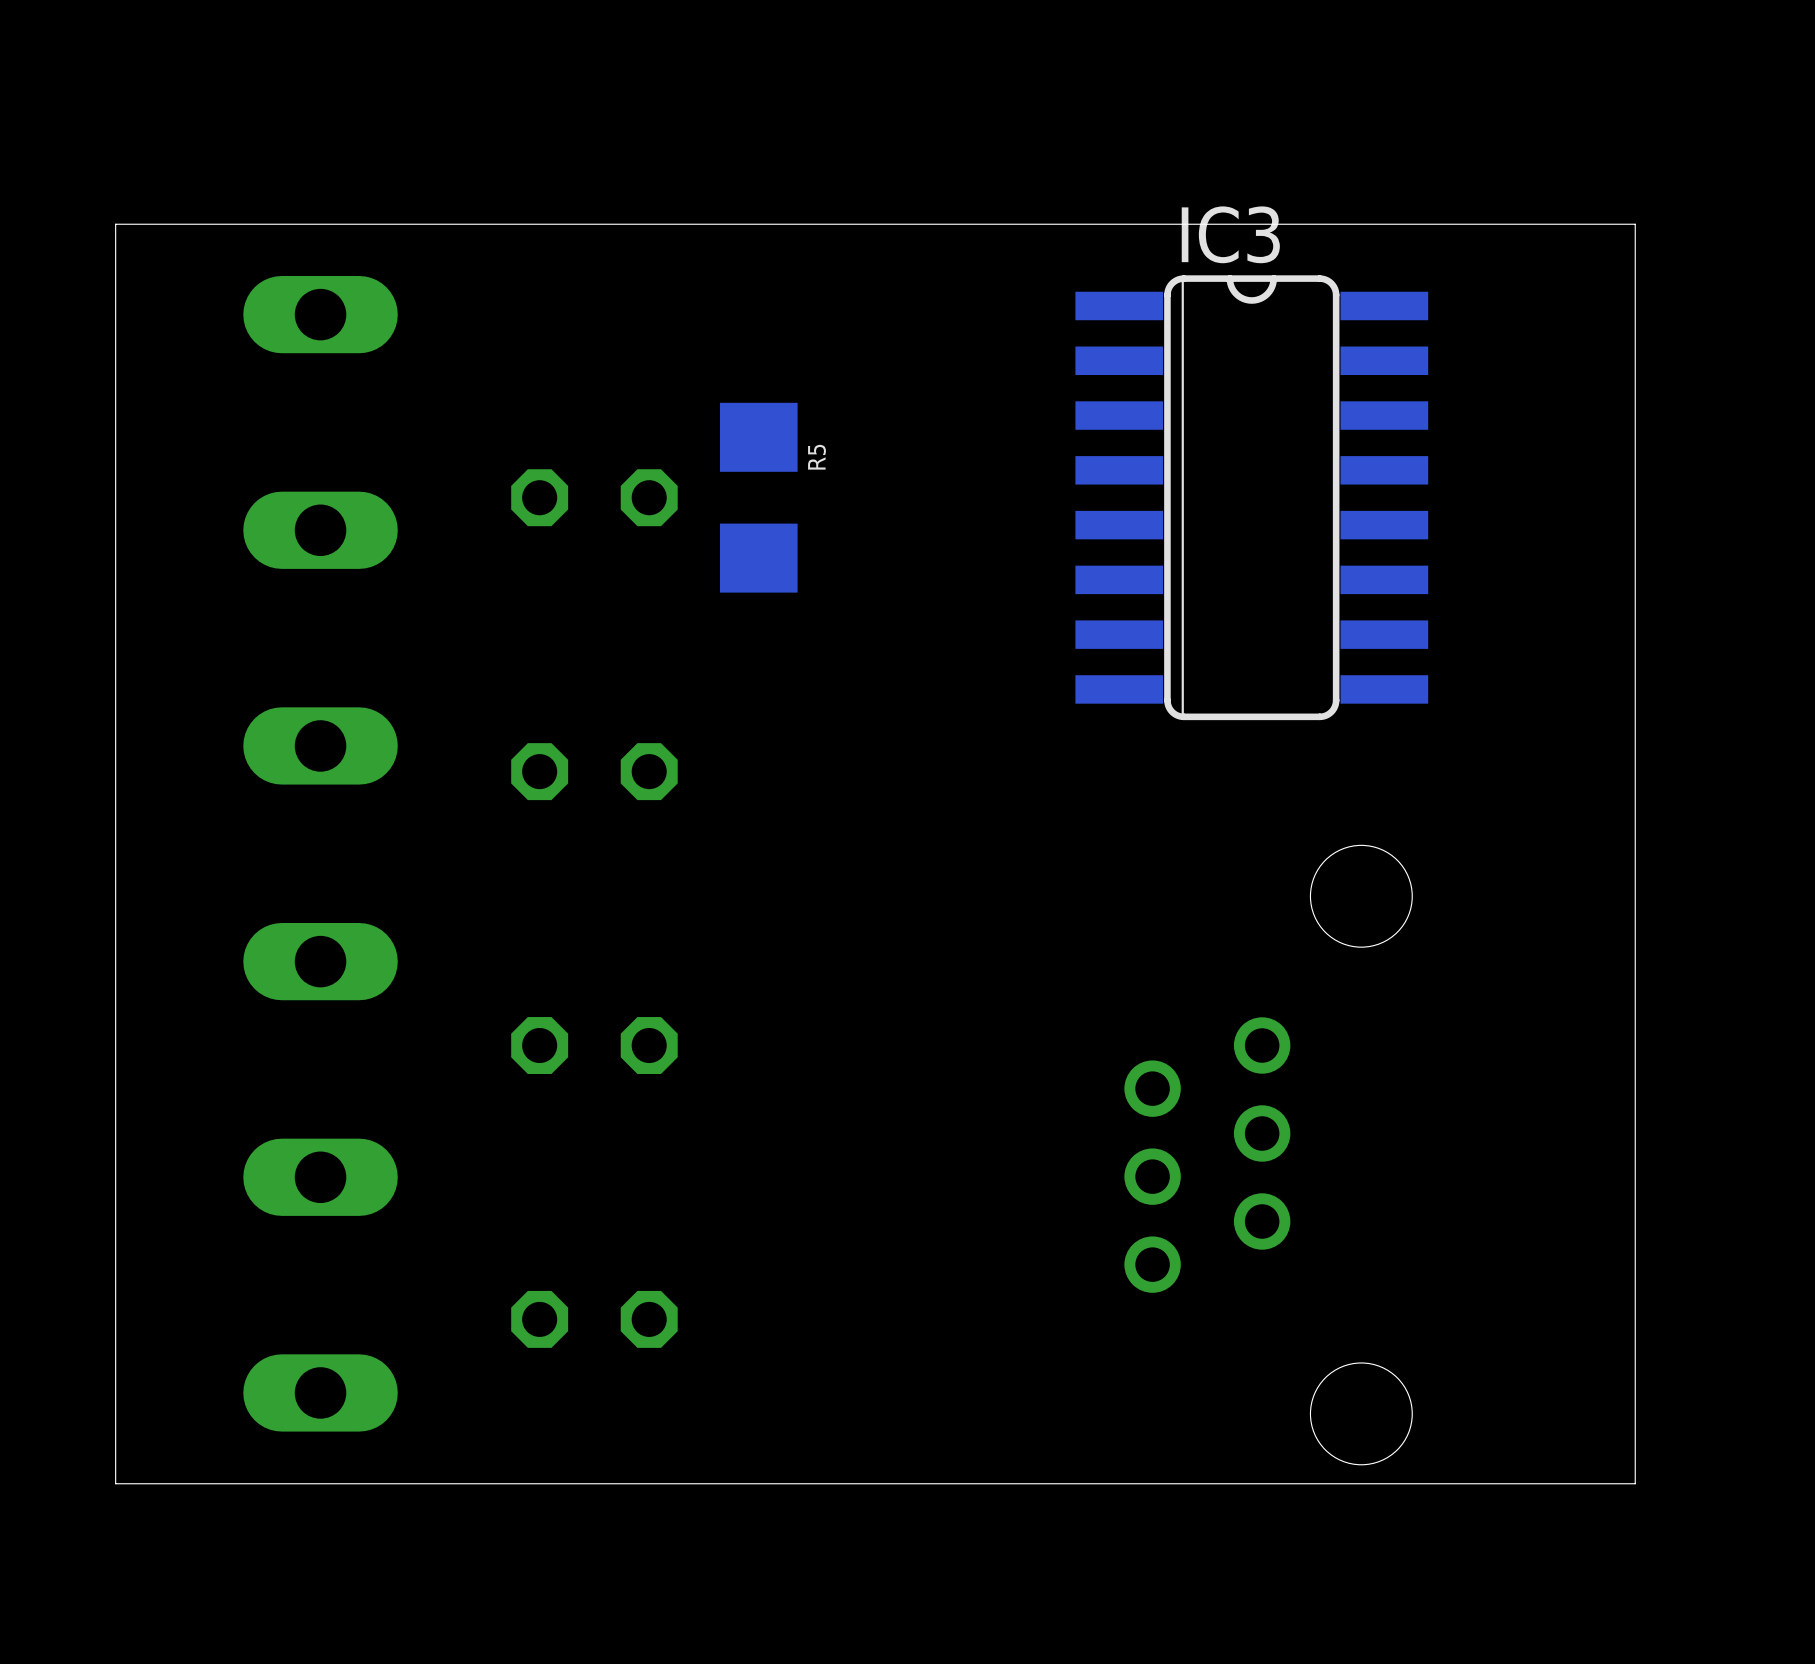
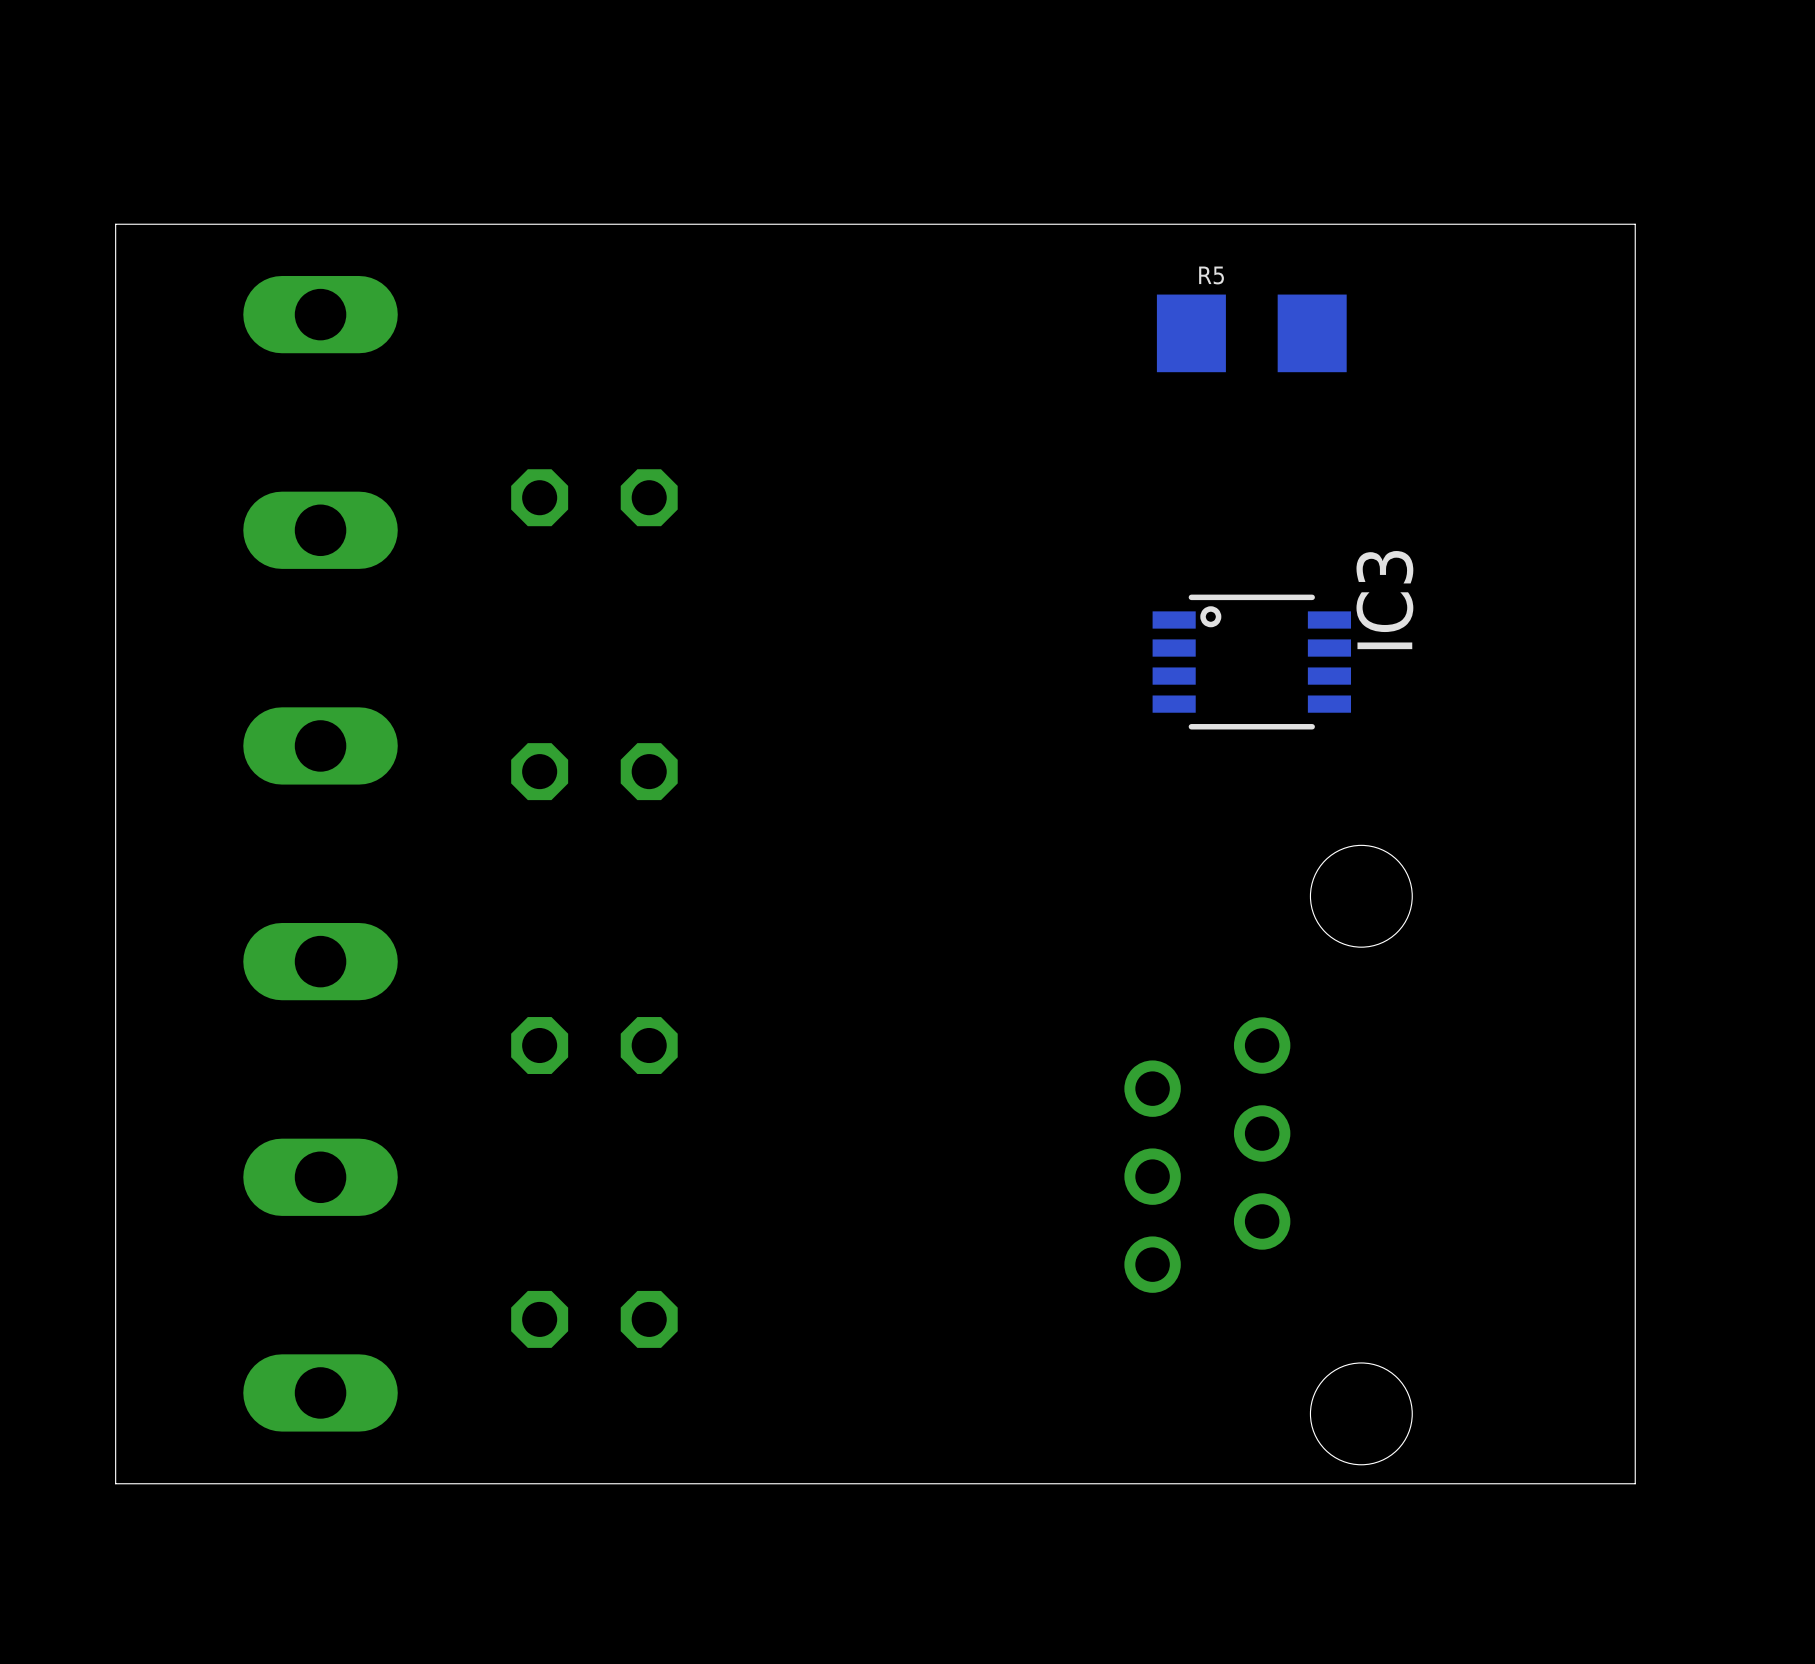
IC3 name position: IC3 (1230, 234) -> IC3 (1384, 600)
IC3 footprint: [1075, 275, 1429, 721] -> [1152, 594, 1352, 730]
R5 name position: R5 (817, 457) -> R5 (1211, 275)
R5 rotation: 0° (758, 497) -> 90° clockwise (1251, 333)
R5 position: (758, 497) -> (1251, 333)

